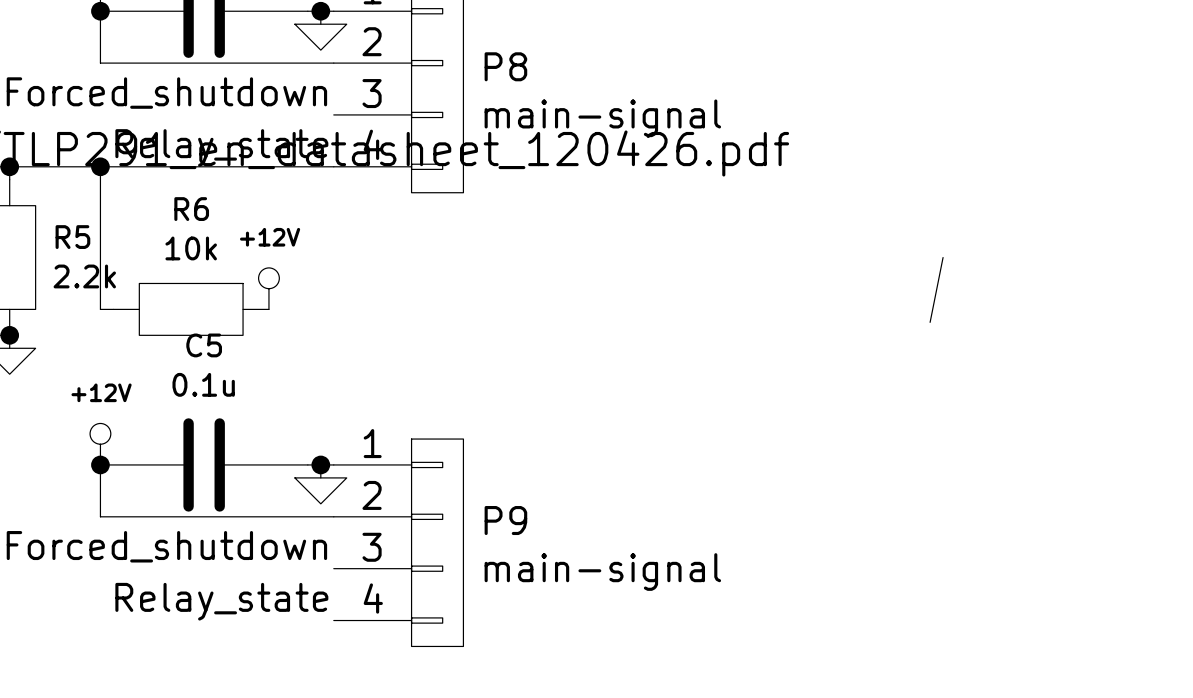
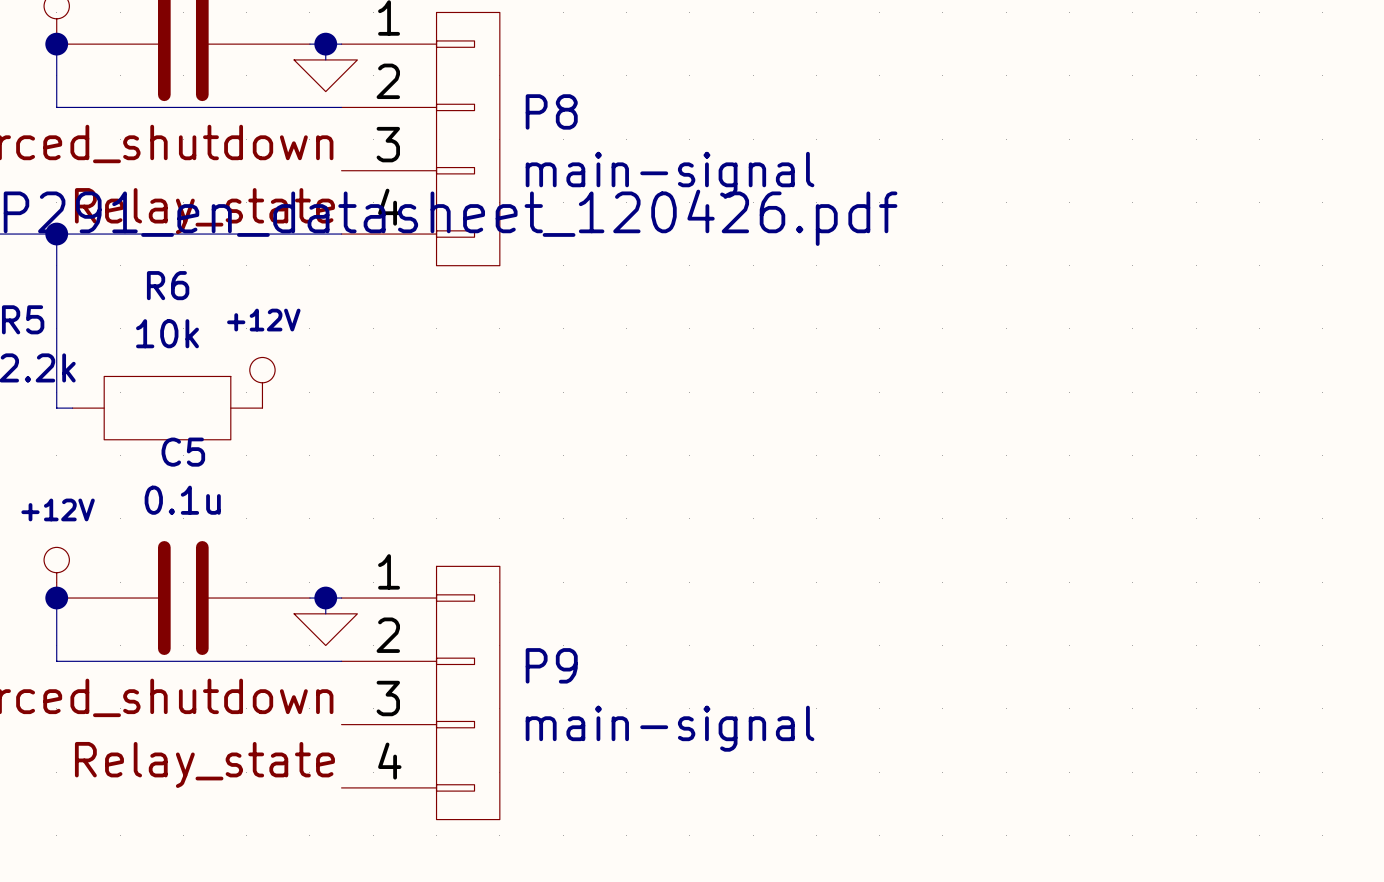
bus: (943, 257) (930, 322) -> none

